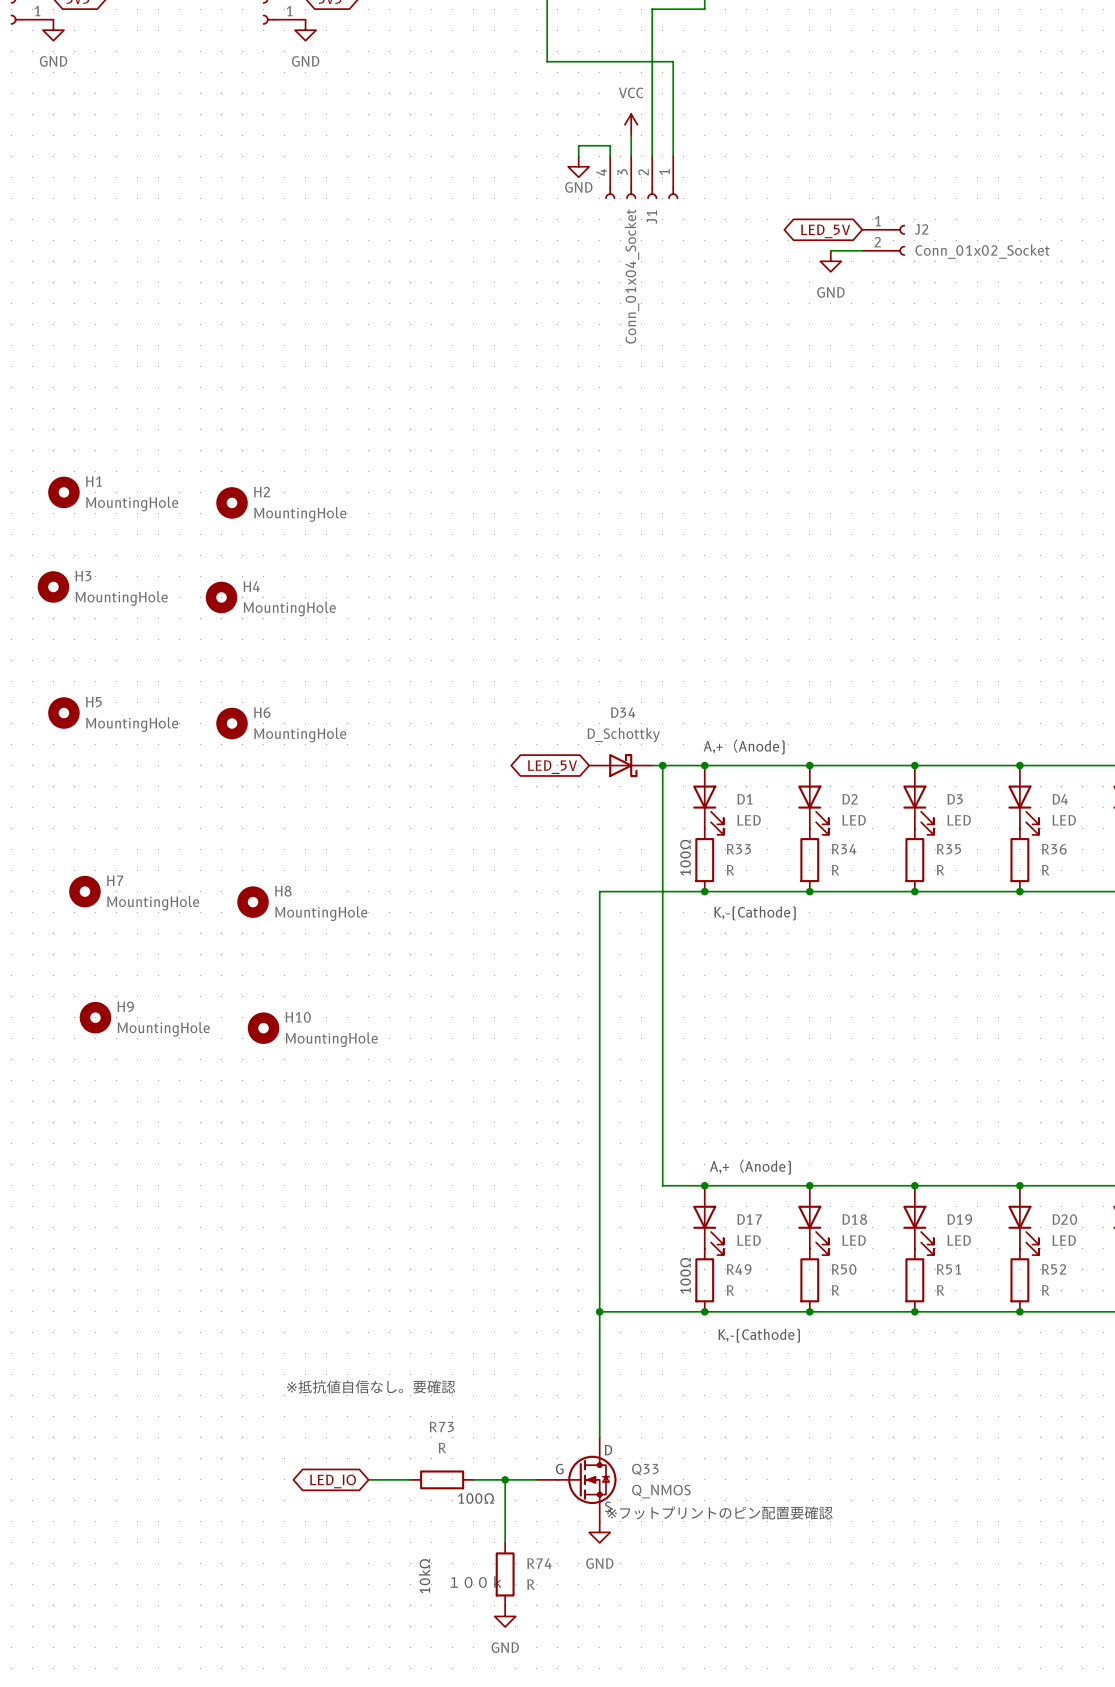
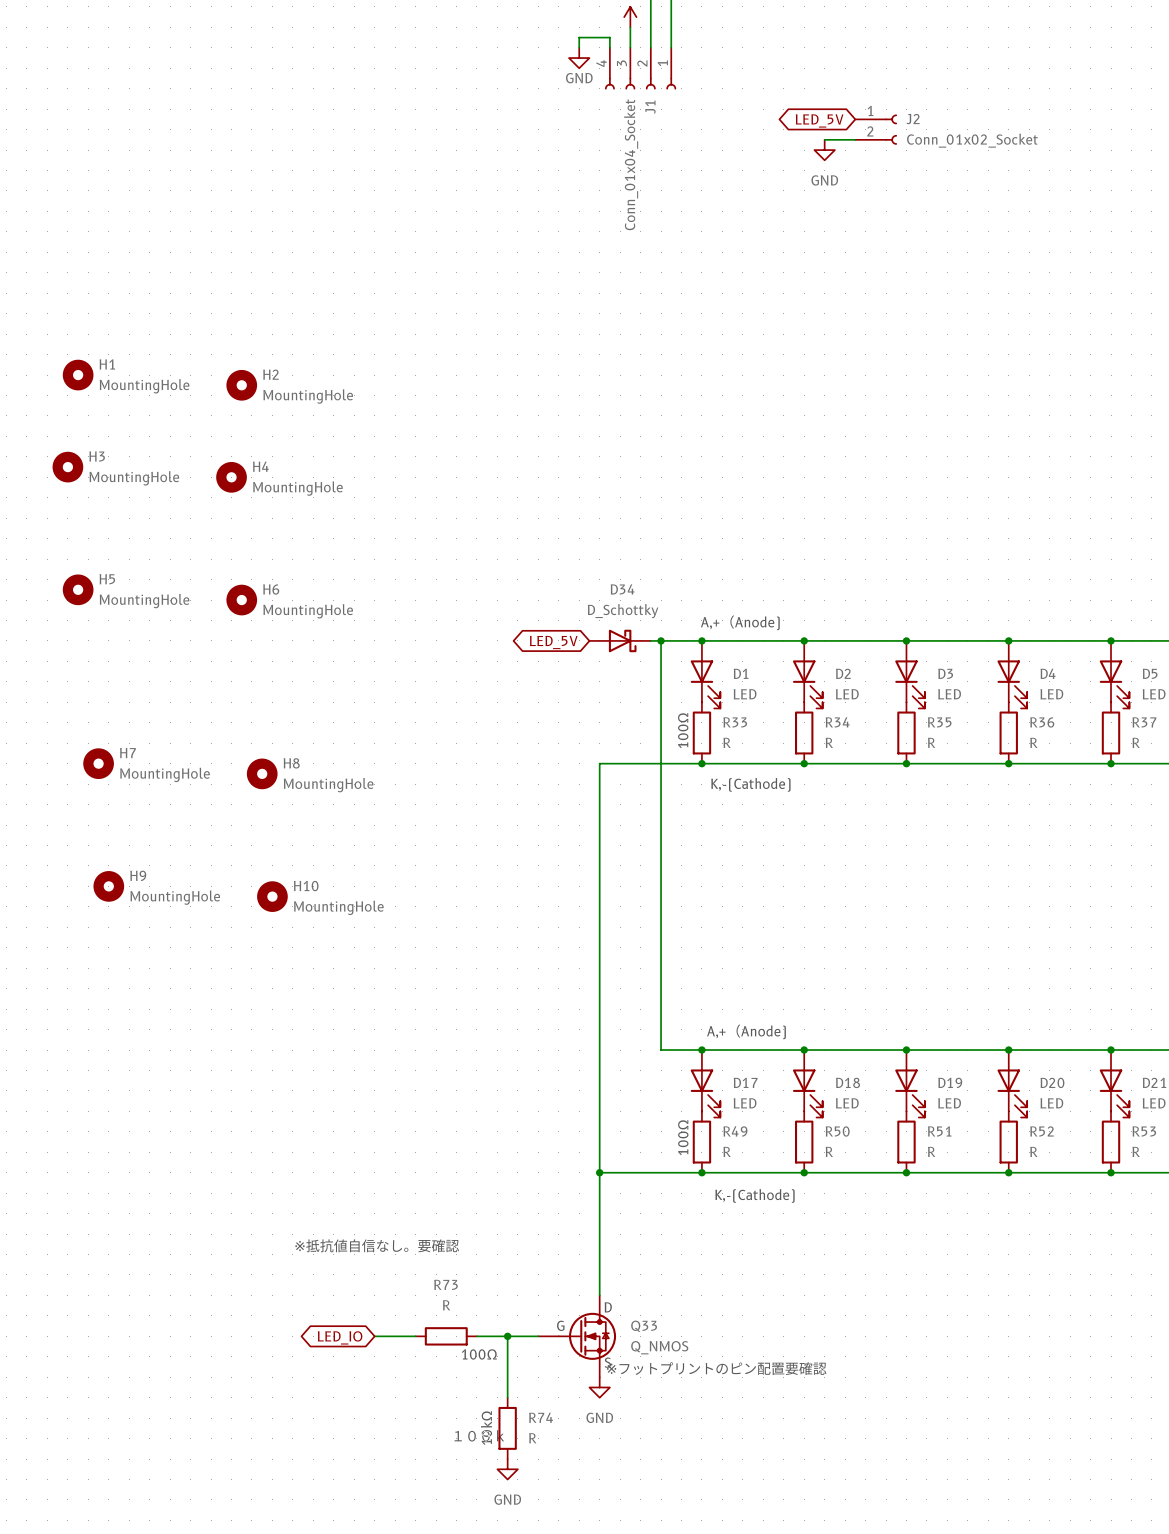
text position: 10kΩ (424, 1576) -> 10kΩ (486, 1428)

